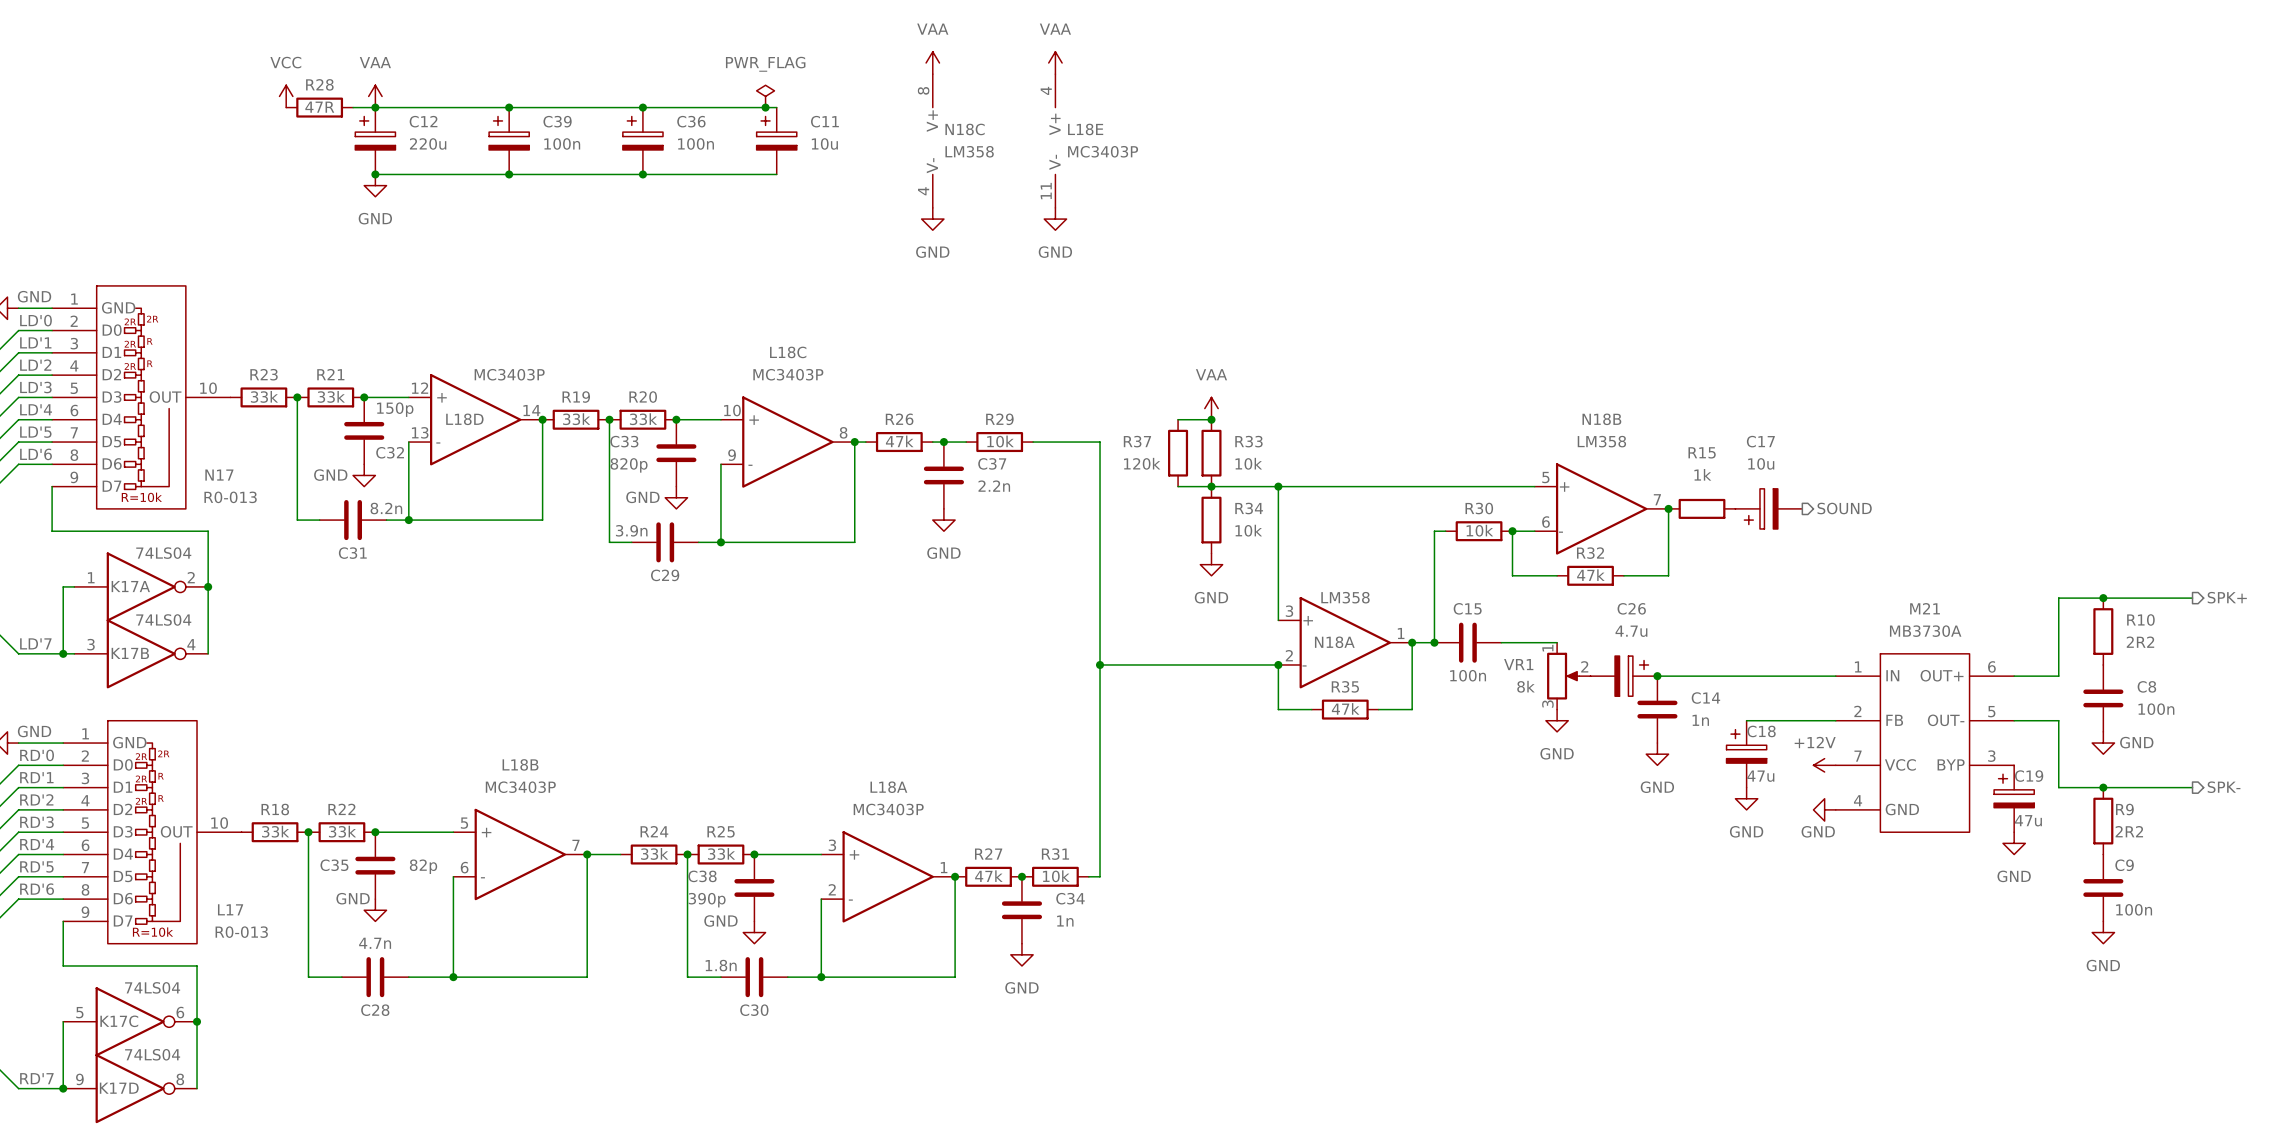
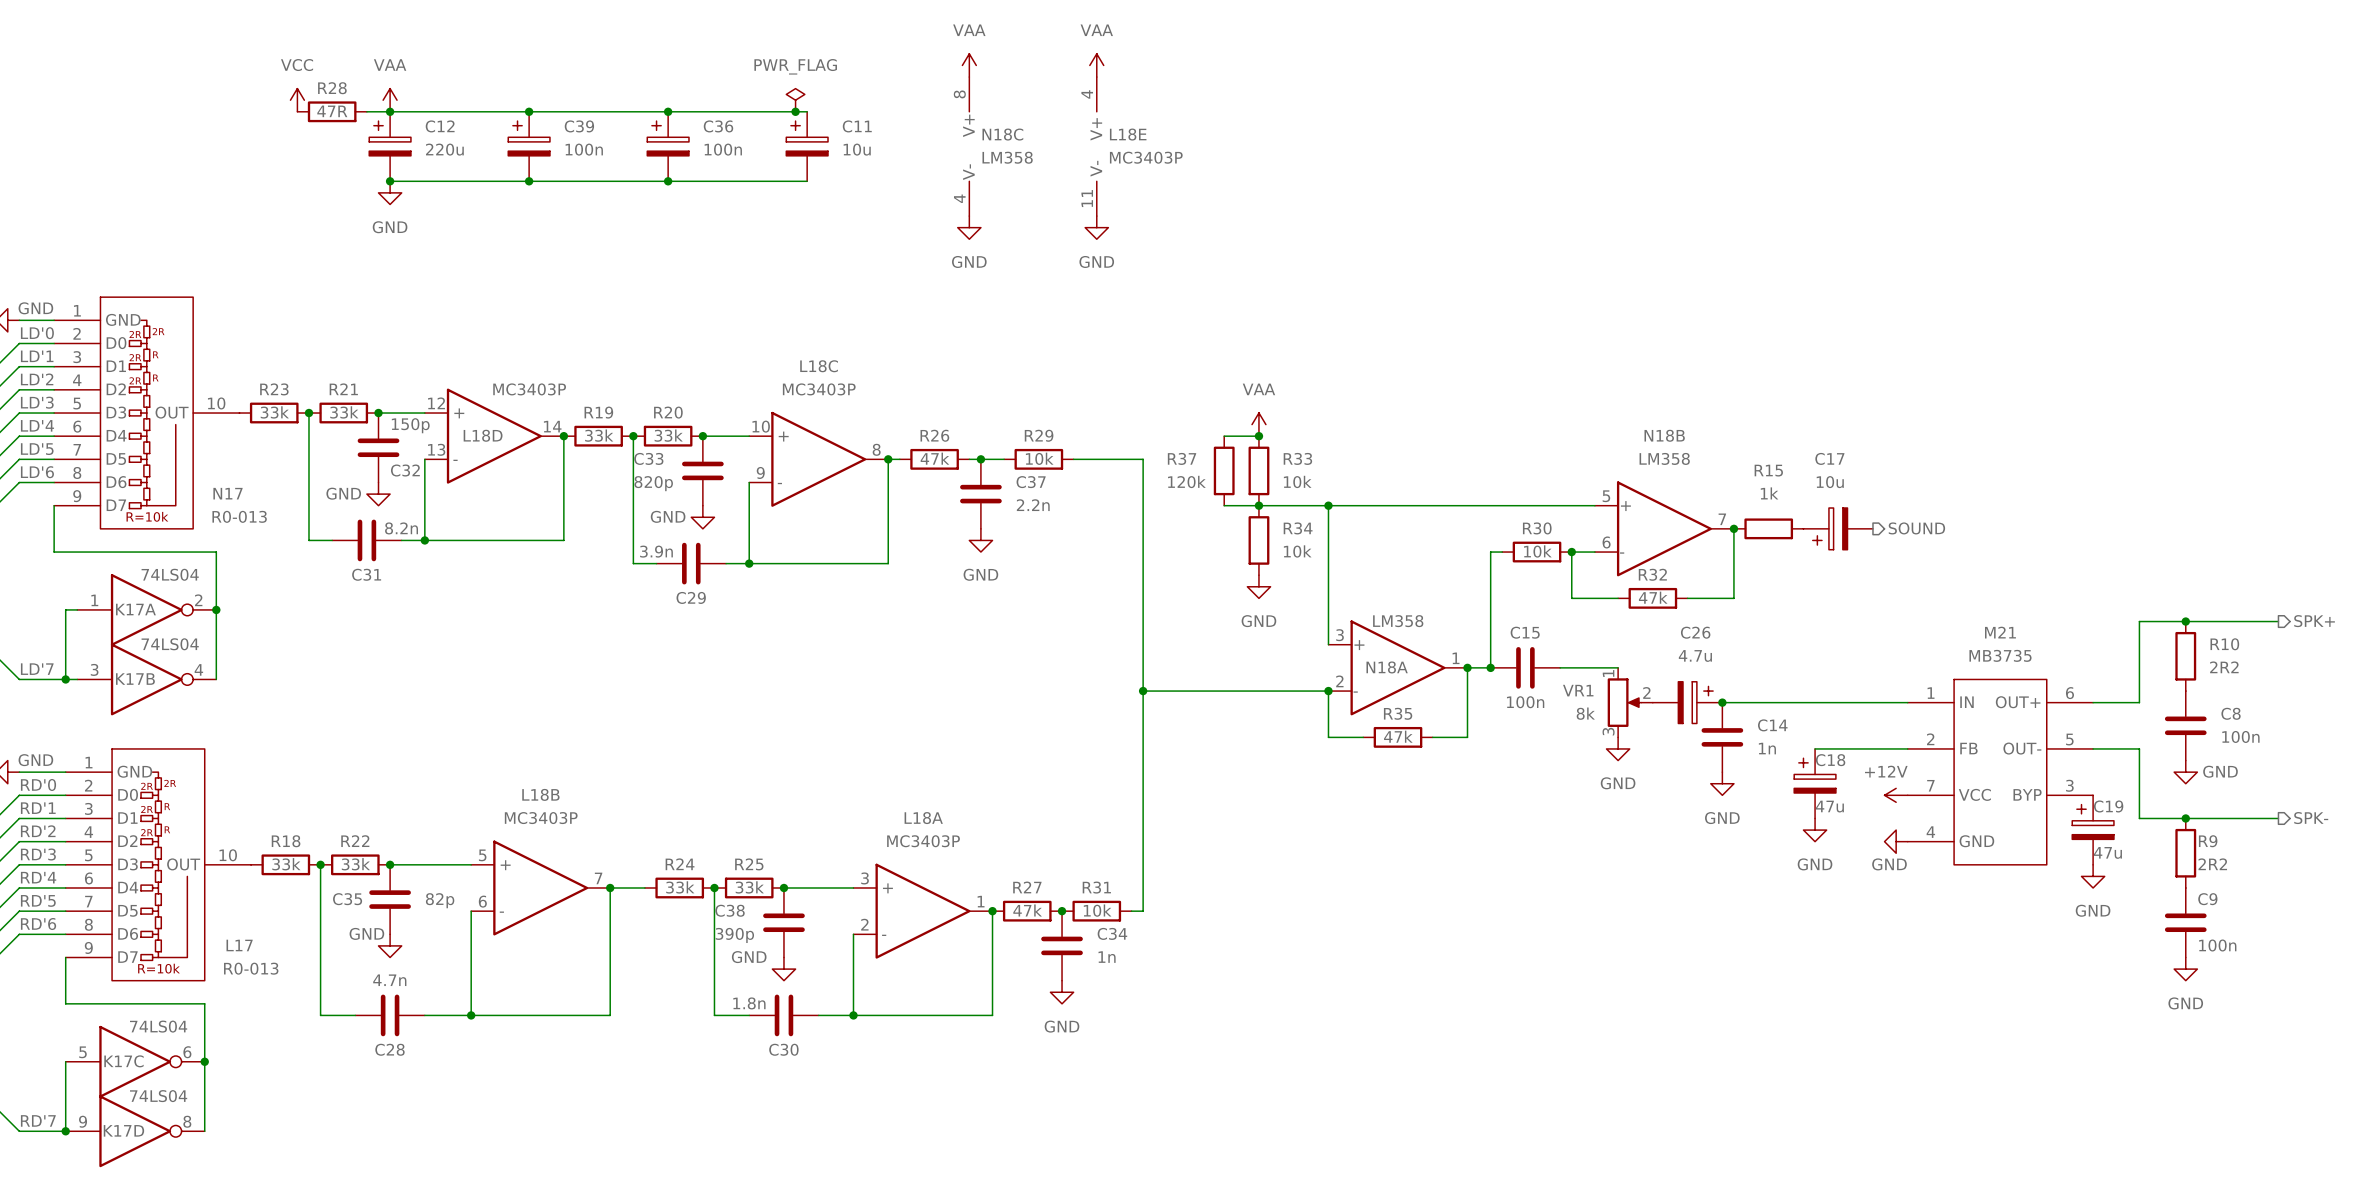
M21 value: MB3730A (1925, 631) -> MB3735 (2000, 655)

